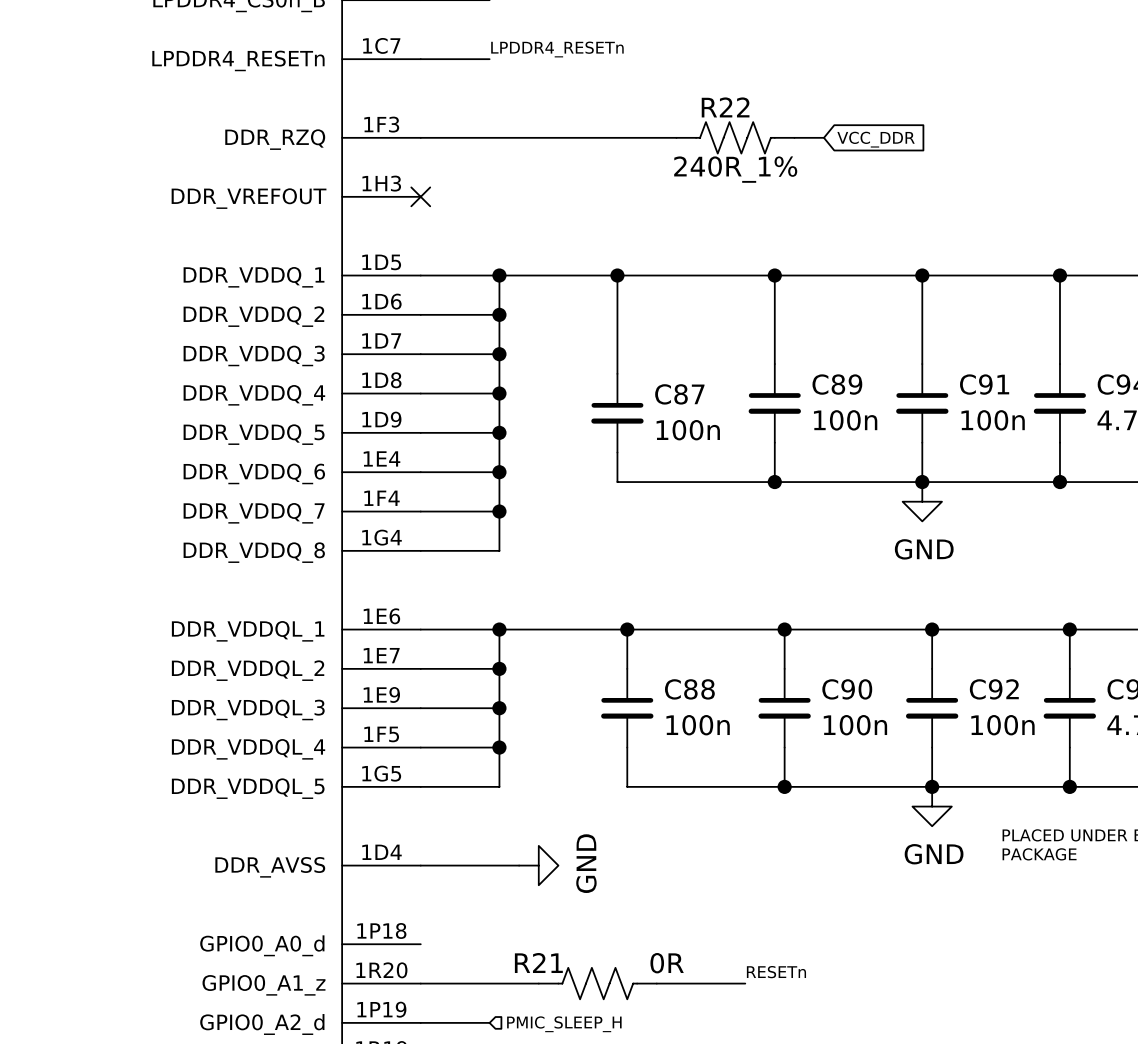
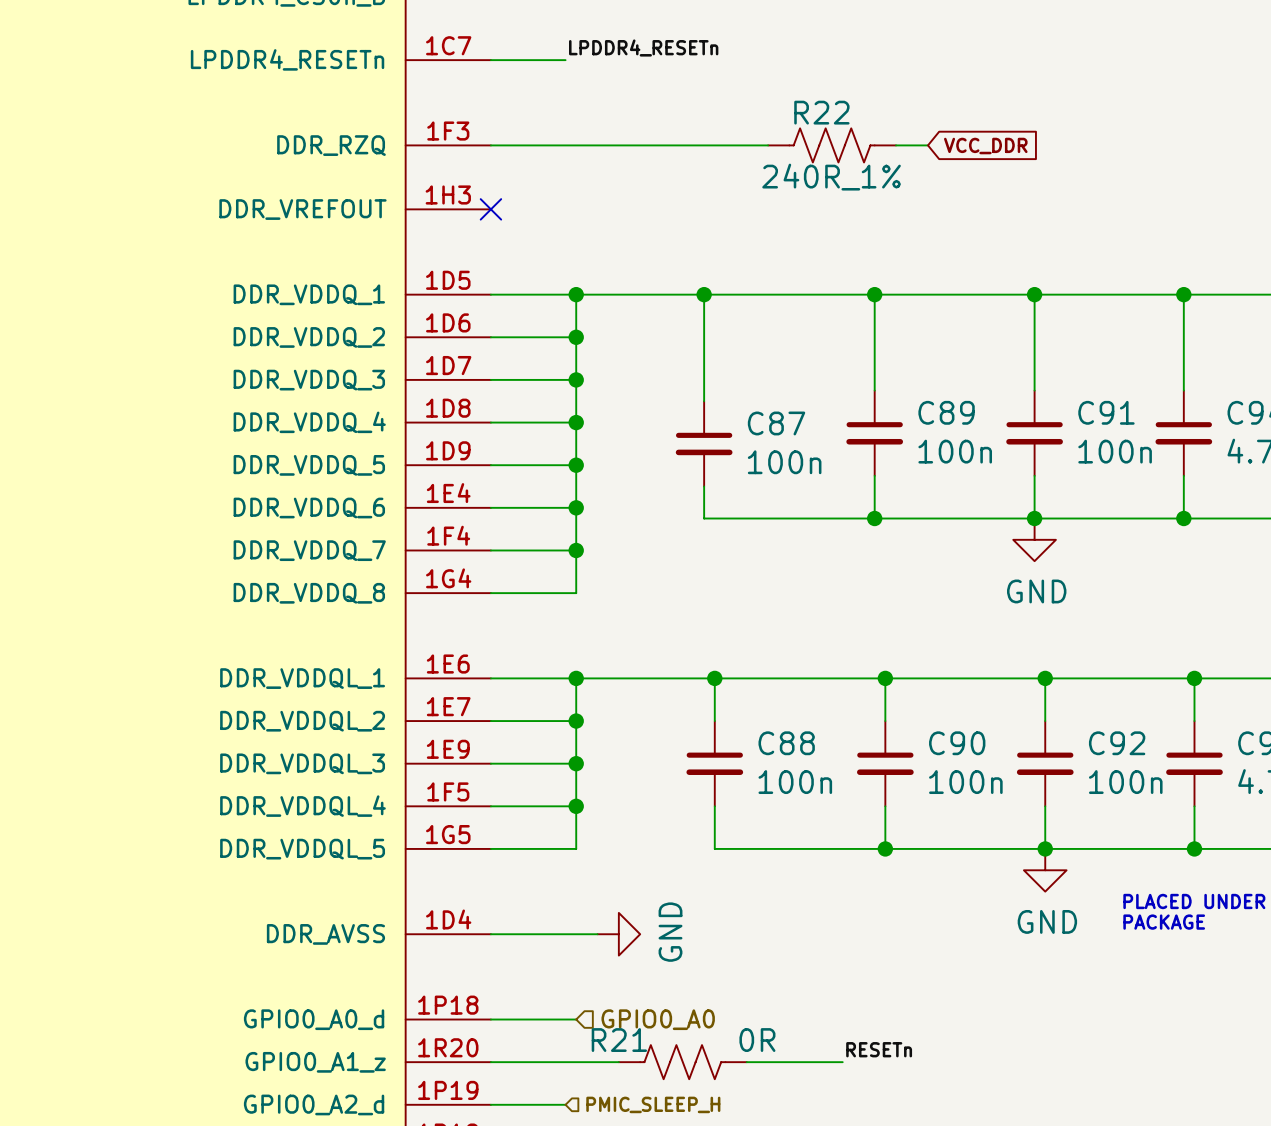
wire: none -> (490, 1019) (576, 1019)
hierarchical label: none -> GPIO0_A0 (658, 1019)

